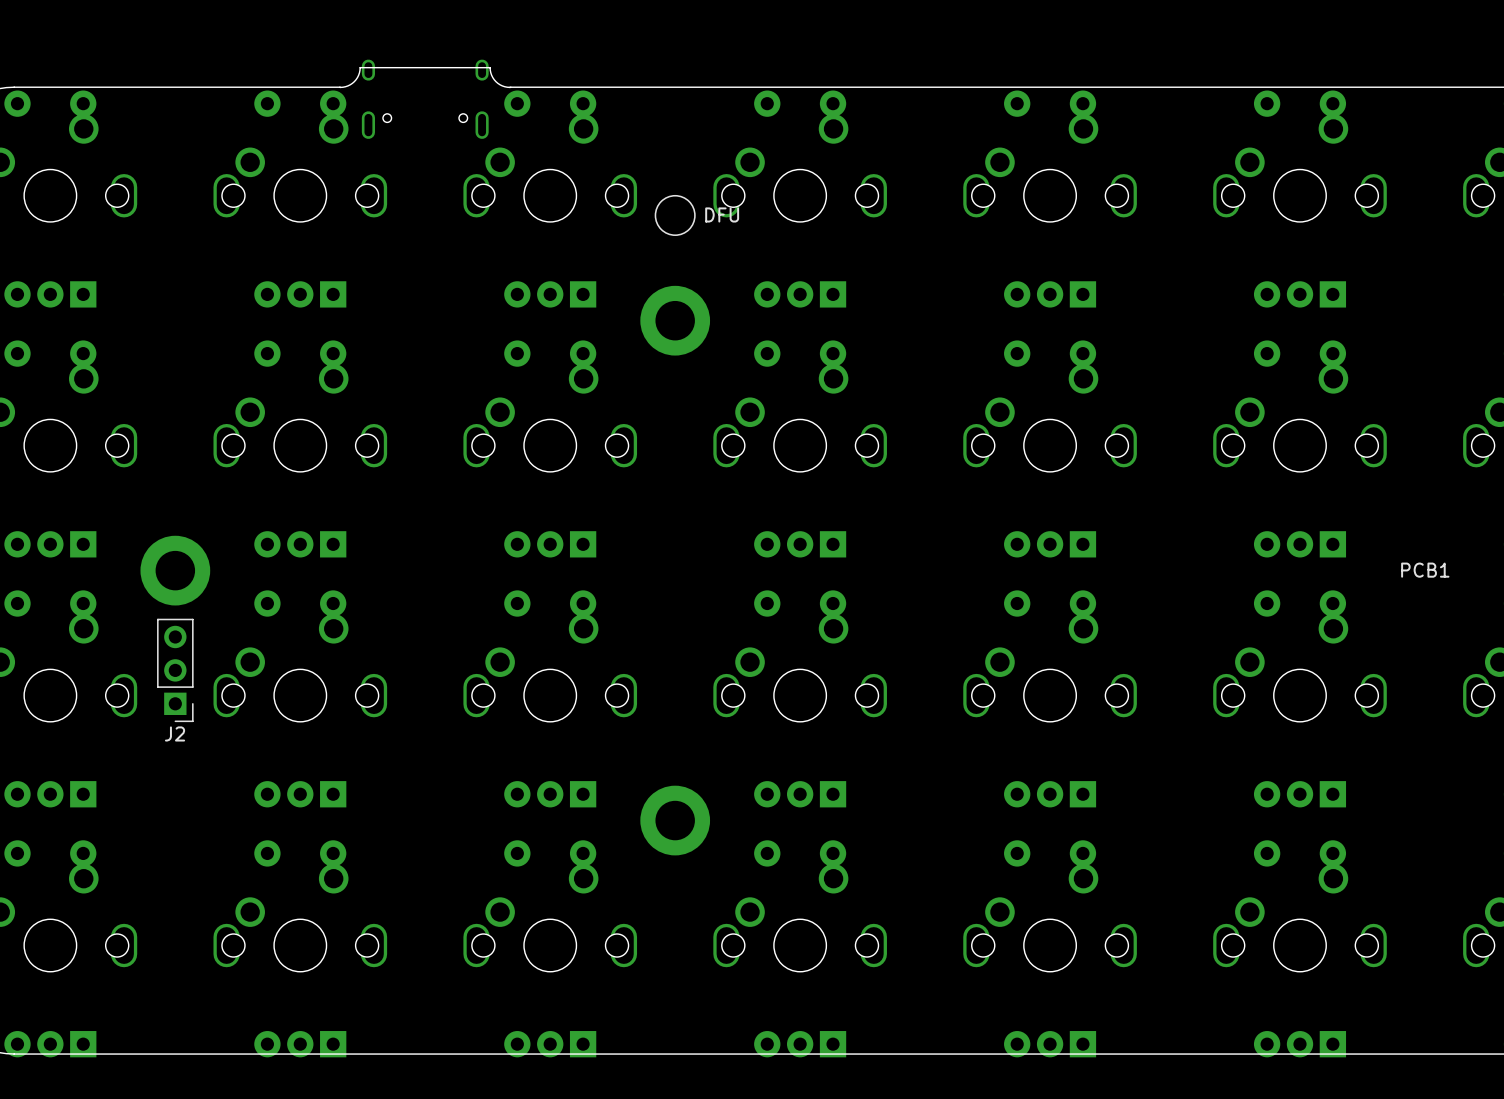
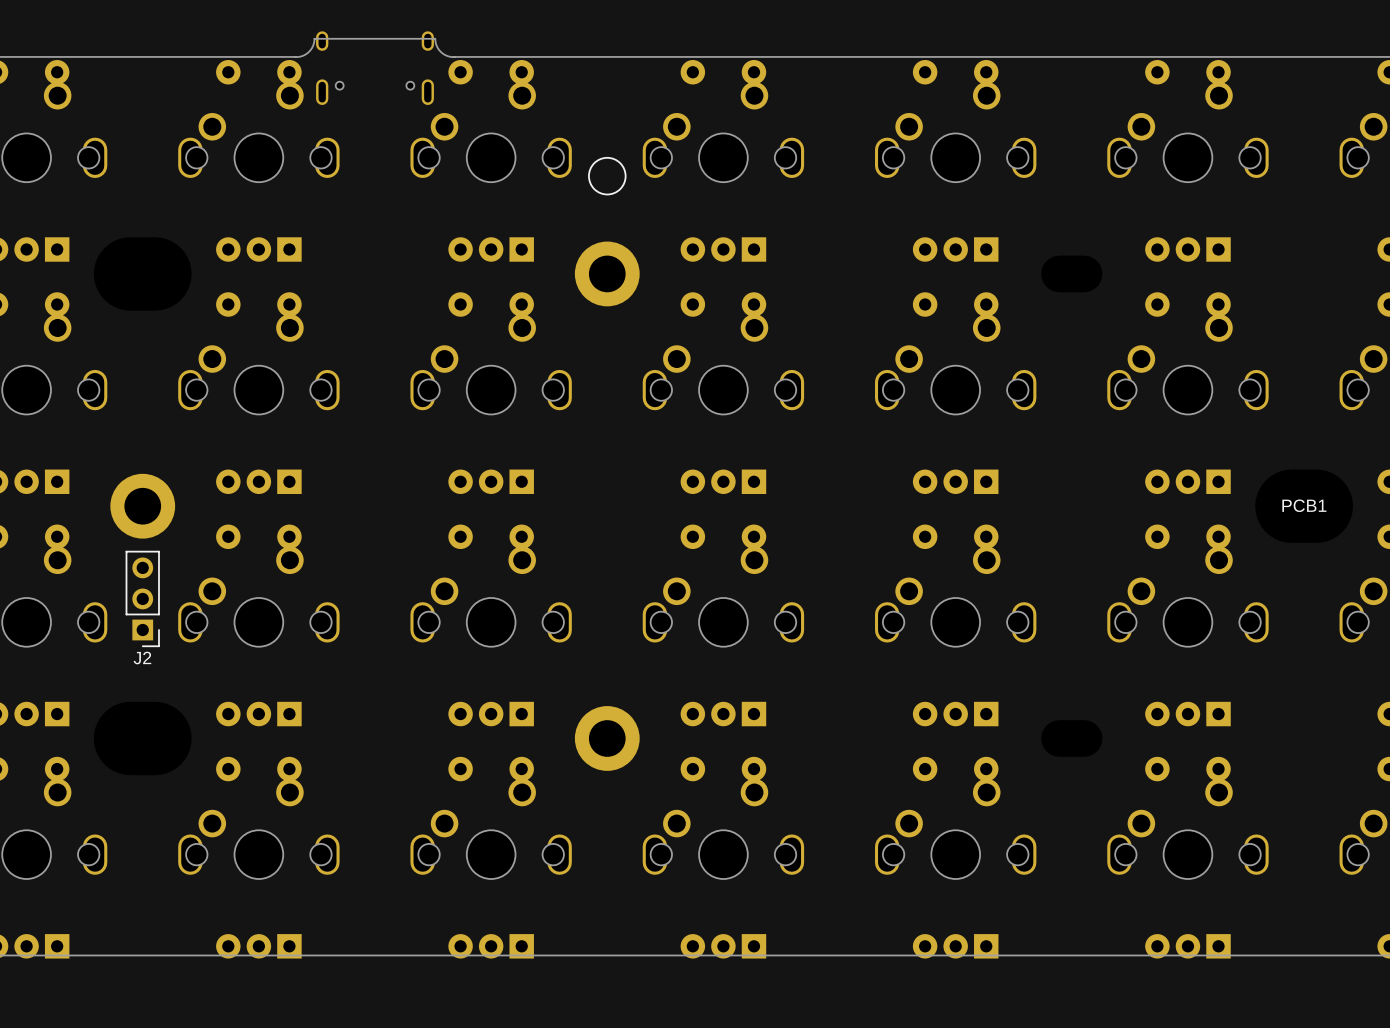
PCB1 text: DFU (722, 214) -> none

